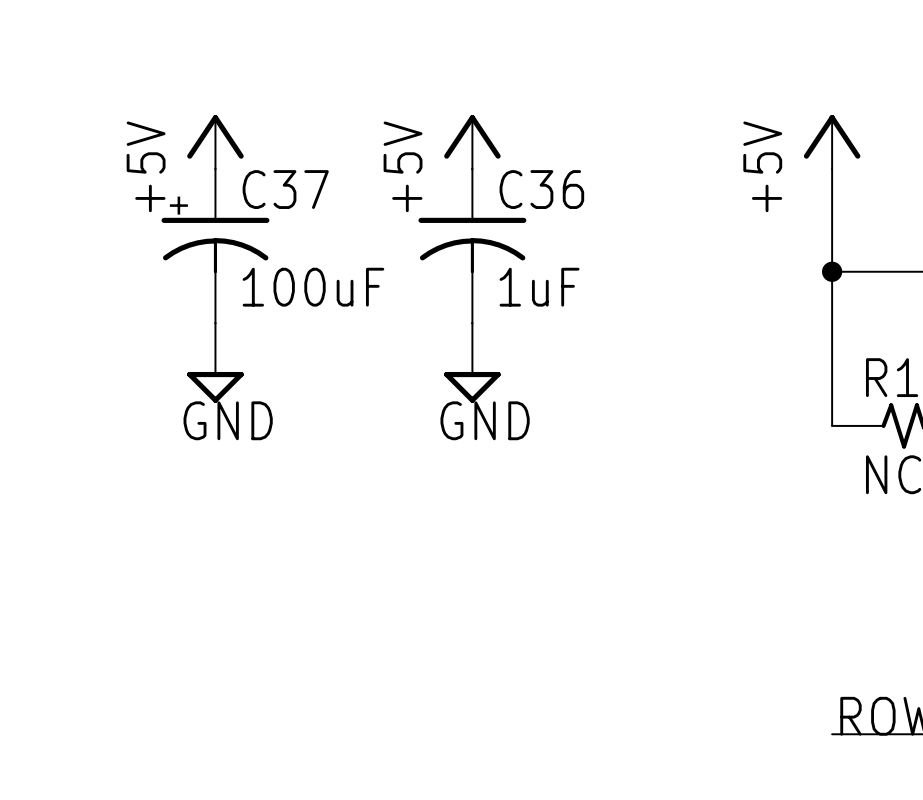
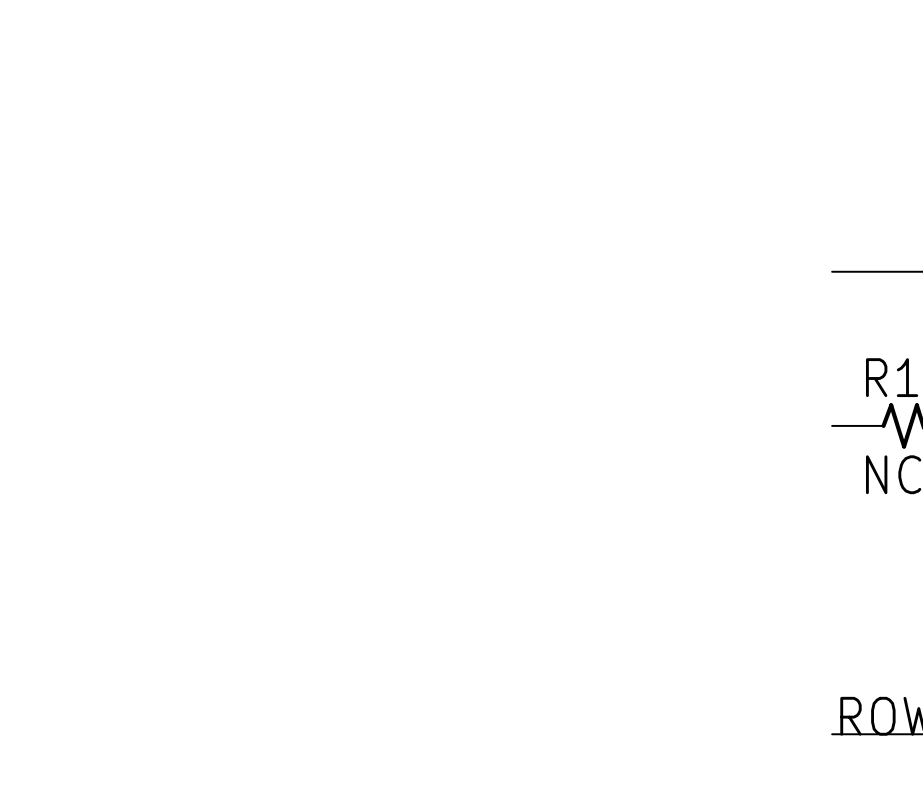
power symbol: +5V (215, 142) -> none
power symbol: +5V (472, 142) -> none
power symbol: +5V (832, 142) -> none
wire: (832, 168) (832, 425) -> none
C37: 100uF (215, 246) -> none
C36: 1uF (472, 246) -> none
junction: (832, 271) -> none
power symbol: GND (215, 362) -> none
power symbol: GND (472, 362) -> none

